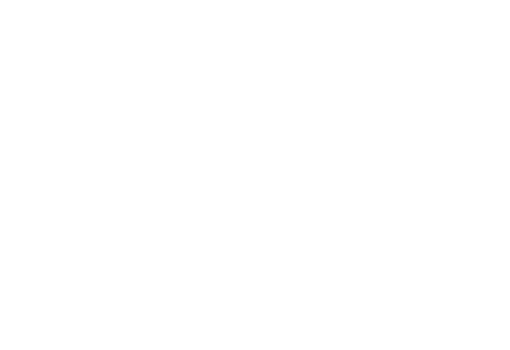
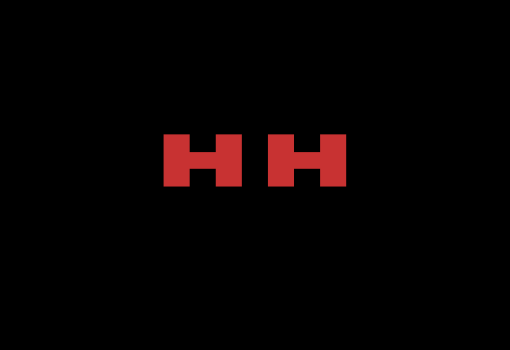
part: none -> (202, 160)
part: none -> (307, 160)

